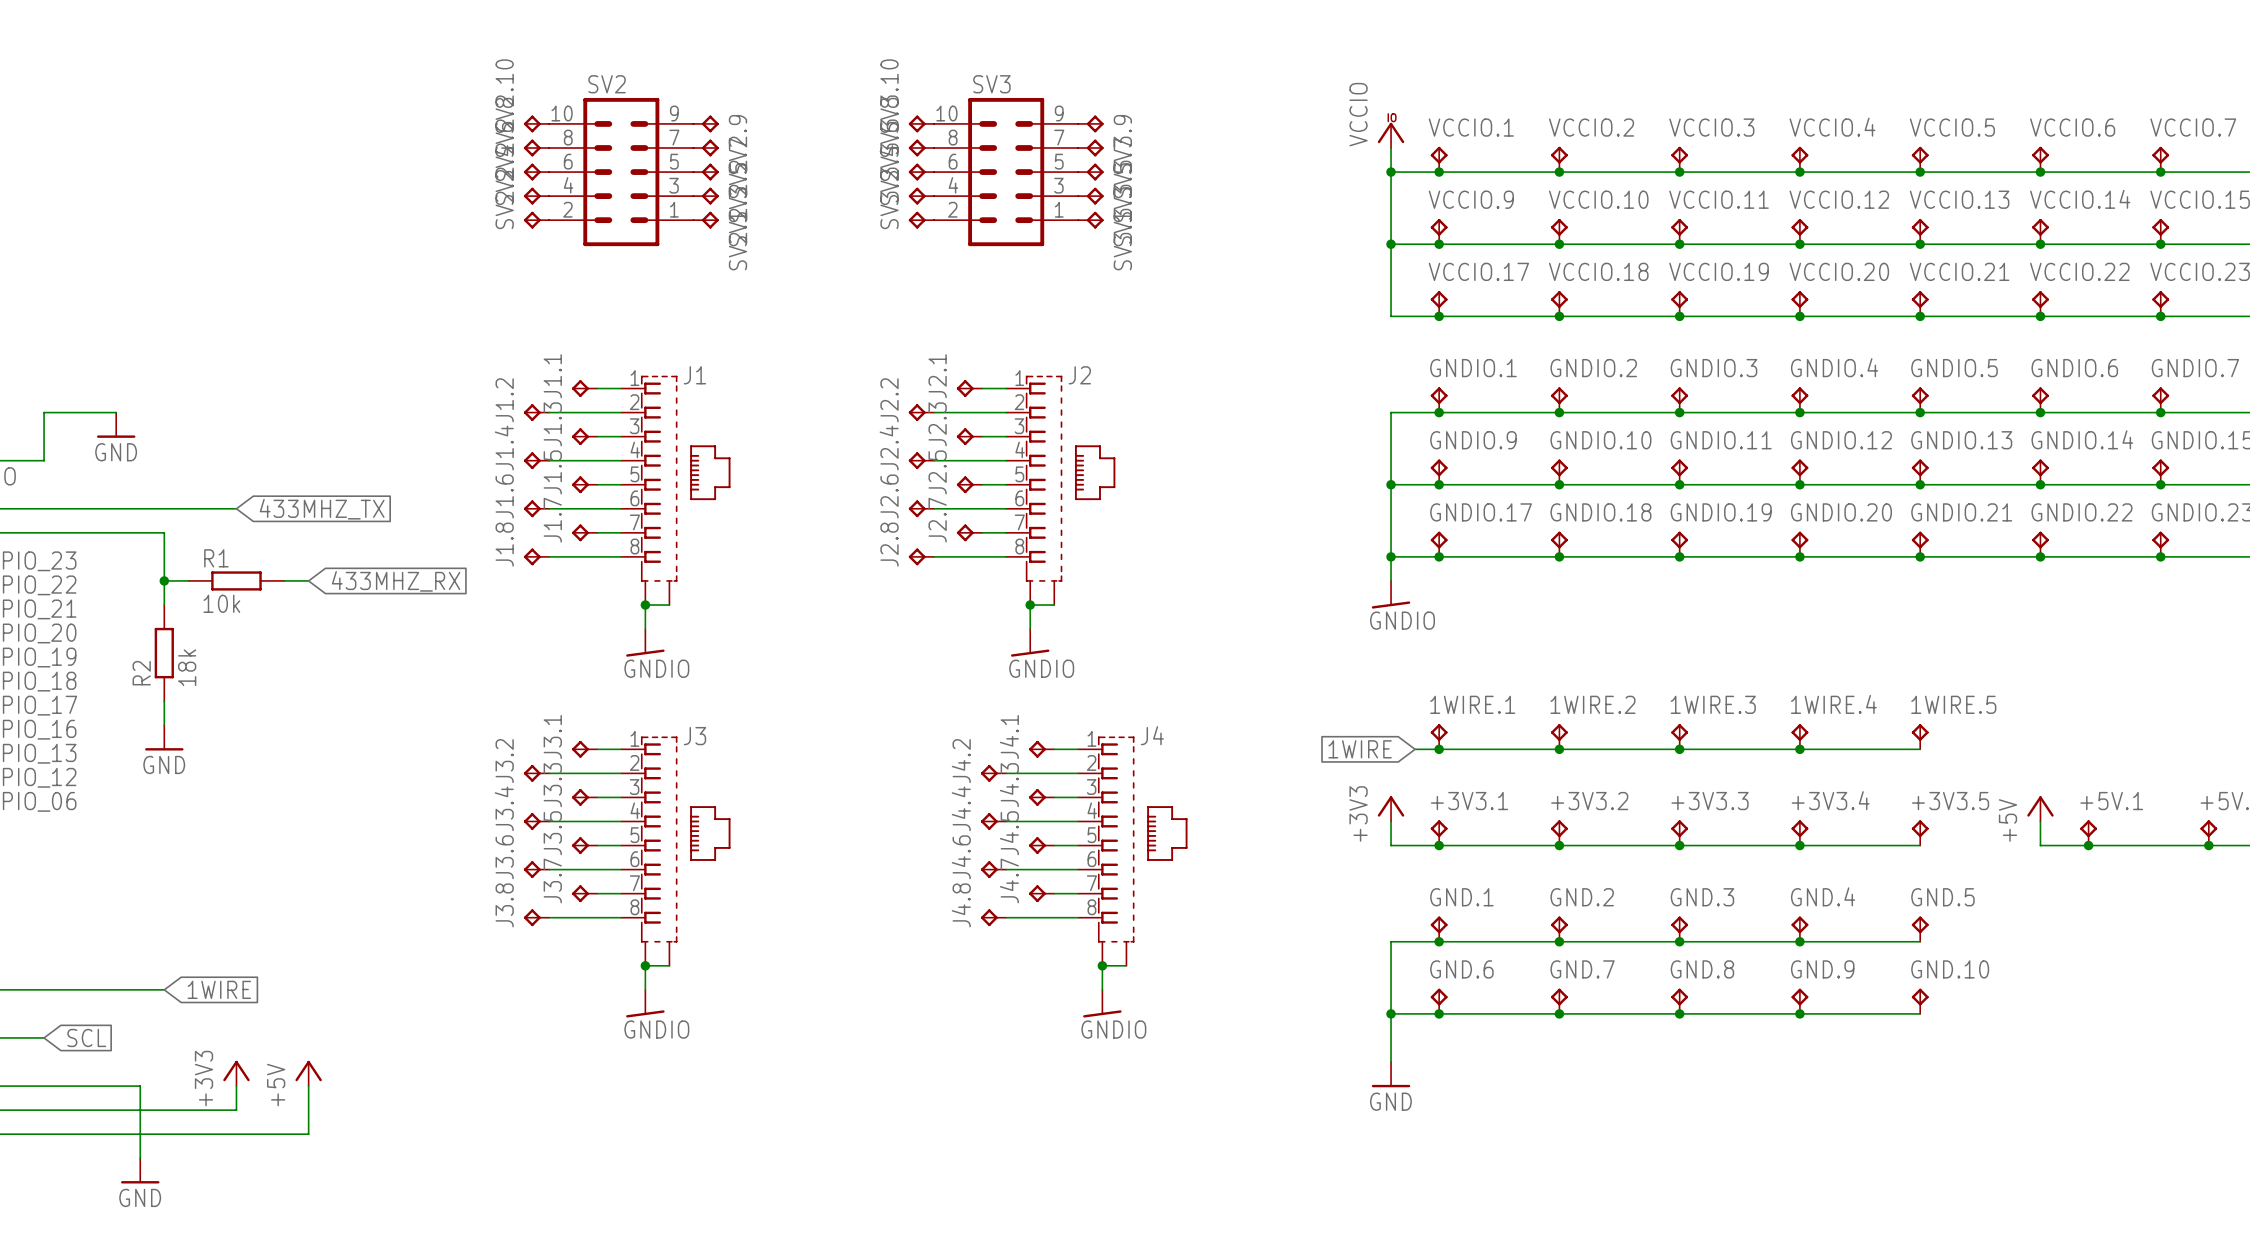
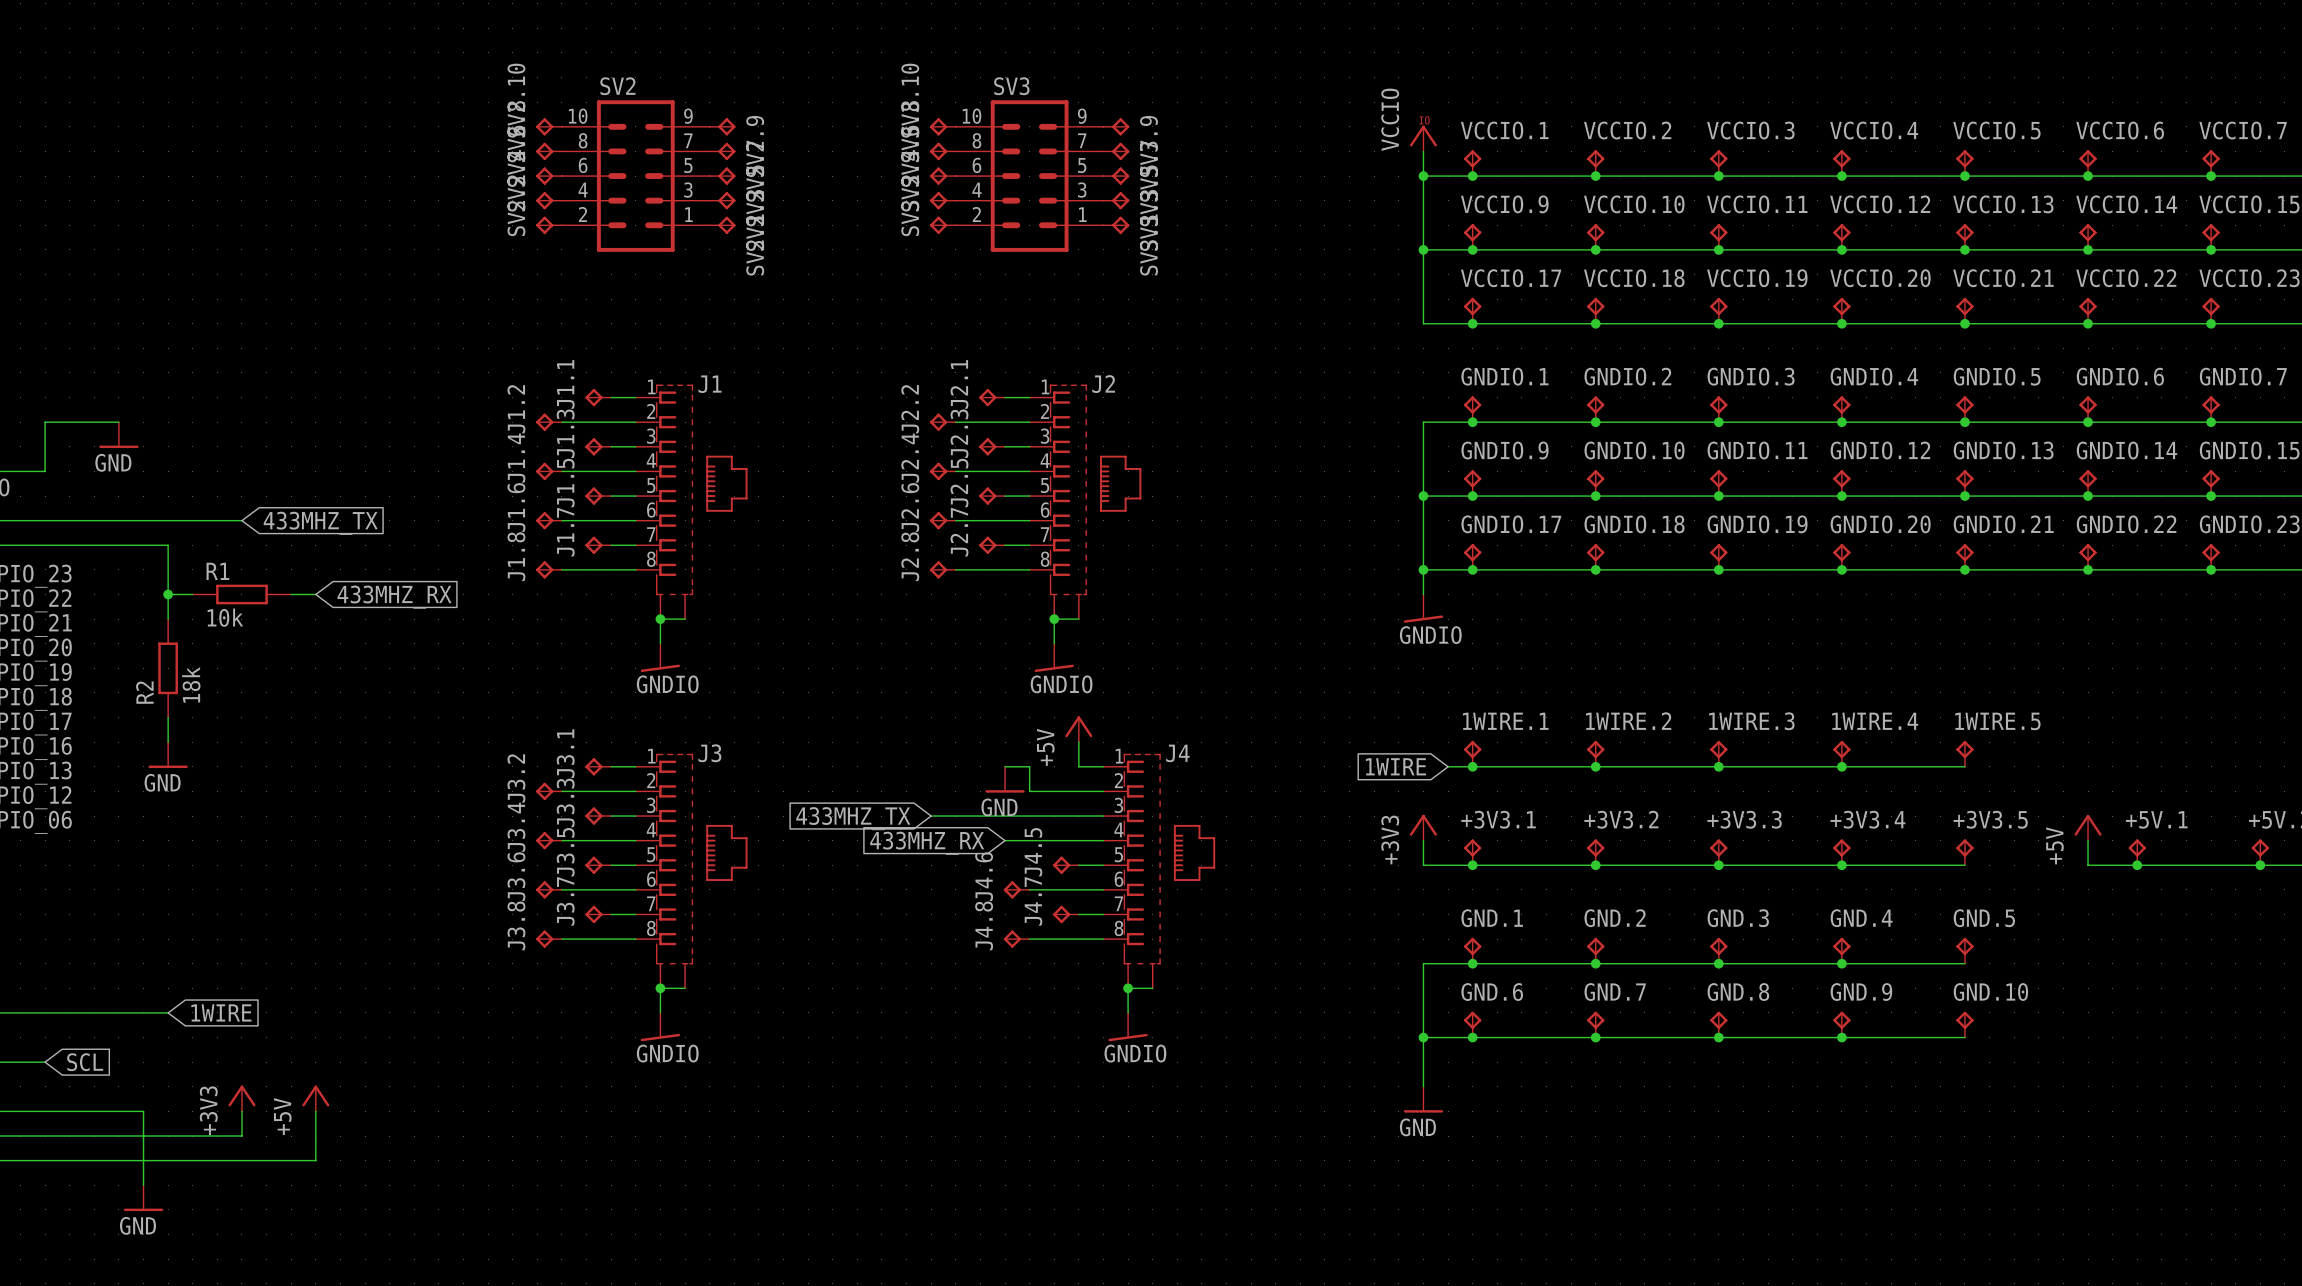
power symbol: none -> +5V (1078, 729)
wire: none -> (1078, 742) (1078, 766)
wire: none -> (1005, 766) (1029, 766) (1029, 791)
J4.1: (1041, 749) -> none
power symbol: none -> GND (1005, 779)
J4.2: (993, 773) -> none
global label: none -> 433MHZ_TX (853, 818)
wire: none -> (931, 816) (1078, 816)
J4.3: (1041, 797) -> none
global label: none -> 433MHZ_RX (927, 843)
J4.4: (993, 821) -> none

